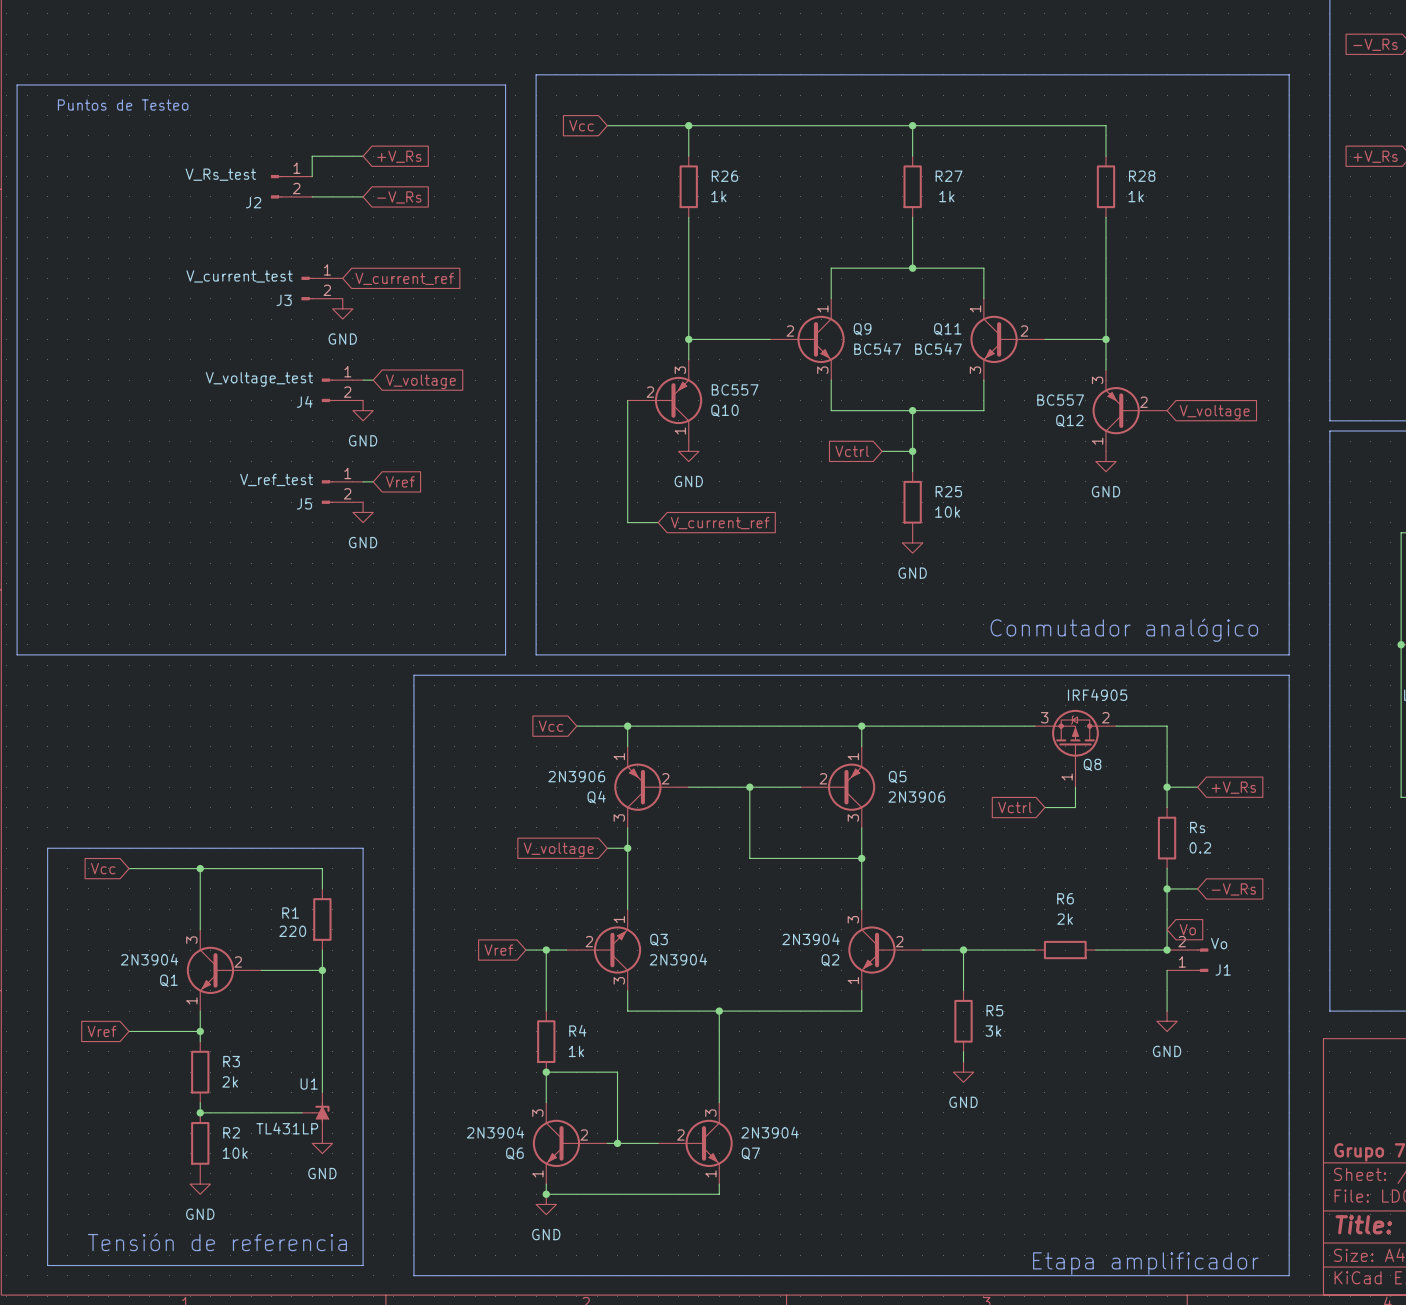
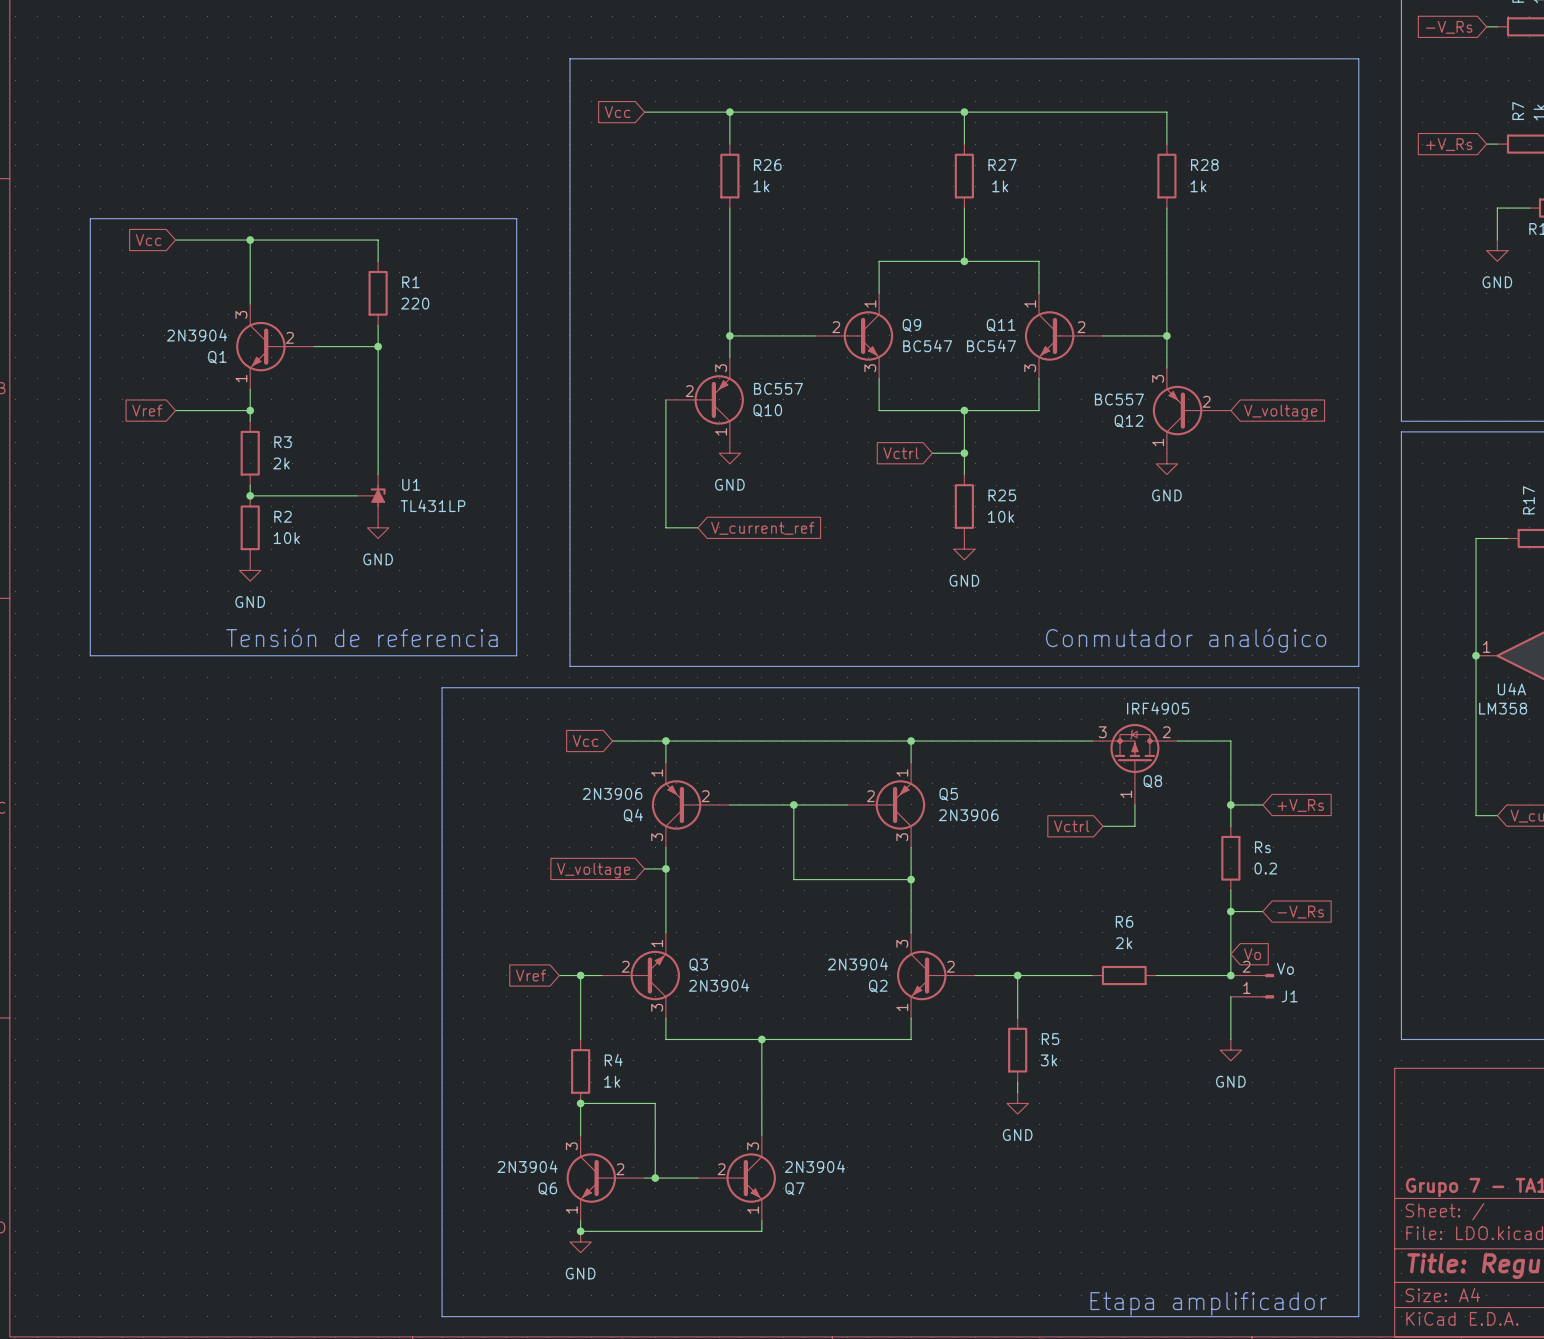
line: (17, 84) (505, 84) (505, 654) (17, 654) (17, 84) -> (90, 218) (90, 655) (516, 655) (516, 218) (90, 218)
text: Puntos de Testeo (123, 105) -> none
wire: (363, 156) (312, 156) (312, 176) -> none
global label: +V_Rs (399, 156) -> none
J2: V_Rs_test (291, 186) -> none
wire: (312, 196) (363, 196) -> none
global label: -V_Rs (399, 197) -> none
global label: none -> Vcc (148, 240)
wire: none -> (175, 240) (378, 240) (378, 261)
wire: none -> (250, 240) (250, 303)
junction: none -> (250, 240)
global label: V_current_ref (404, 278) -> none
J3: V_current_test (322, 288) -> none
power symbol: GND (342, 308) -> none
wire: none -> (378, 325) (378, 474)
wire: none -> (314, 346) (378, 346)
junction: none -> (378, 346)
wire: (363, 380) (373, 380) -> none
global label: V_voltage (420, 381) -> none
wire: none -> (250, 389) (250, 421)
J4: V_voltage_test (342, 390) -> none
global label: none -> Vref (147, 410)
wire: none -> (175, 410) (250, 410)
junction: none -> (250, 410)
power symbol: GND (363, 410) -> none
wire: none -> (250, 485) (250, 495) (356, 495)
wire: (363, 481) (373, 481) -> none
global label: Vref (400, 481) -> none
junction: none -> (250, 495)
J5: V_ref_test (342, 492) -> none
power symbol position: GND (363, 512) -> GND (378, 527)
power symbol: none -> GND (250, 570)
text: none -> Tensión de referencia (361, 637)
line: (47, 848) (363, 848) (363, 1265) (47, 1265) (47, 848) -> none
global label: Vcc (103, 868) -> none
wire: (129, 868) (322, 868) (322, 888) -> none
wire: (200, 868) (200, 929) -> none
junction: (200, 868) -> none
R1 name position: R1 (290, 913) -> R1 (410, 282)
R1 position: (322, 919) -> (378, 293)
R1 value position: 220 (292, 931) -> 220 (415, 303)
wire: (322, 950) (322, 1092) -> none
Q1 position: (224, 970) -> (275, 346)
wire: (261, 970) (322, 970) -> none
junction: (322, 970) -> none
wire: (200, 1011) (200, 1041) -> none
global label: Vref (101, 1031) -> none
wire: (129, 1031) (200, 1031) -> none
junction: (200, 1031) -> none
R3 position: (200, 1072) -> (250, 453)
U1 name position: U1 (309, 1083) -> U1 (411, 484)
wire: (200, 1102) (200, 1112) (302, 1112) -> none
junction: (200, 1112) -> none
U1 position: (315, 1112) -> (371, 495)
U1 value position: TL431LP (287, 1128) -> TL431LP (433, 505)
R2 position: (200, 1143) -> (250, 527)
power symbol: GND (322, 1143) -> none
power symbol: GND (200, 1184) -> none
text: Tensión de referencia (217, 1242) -> none

